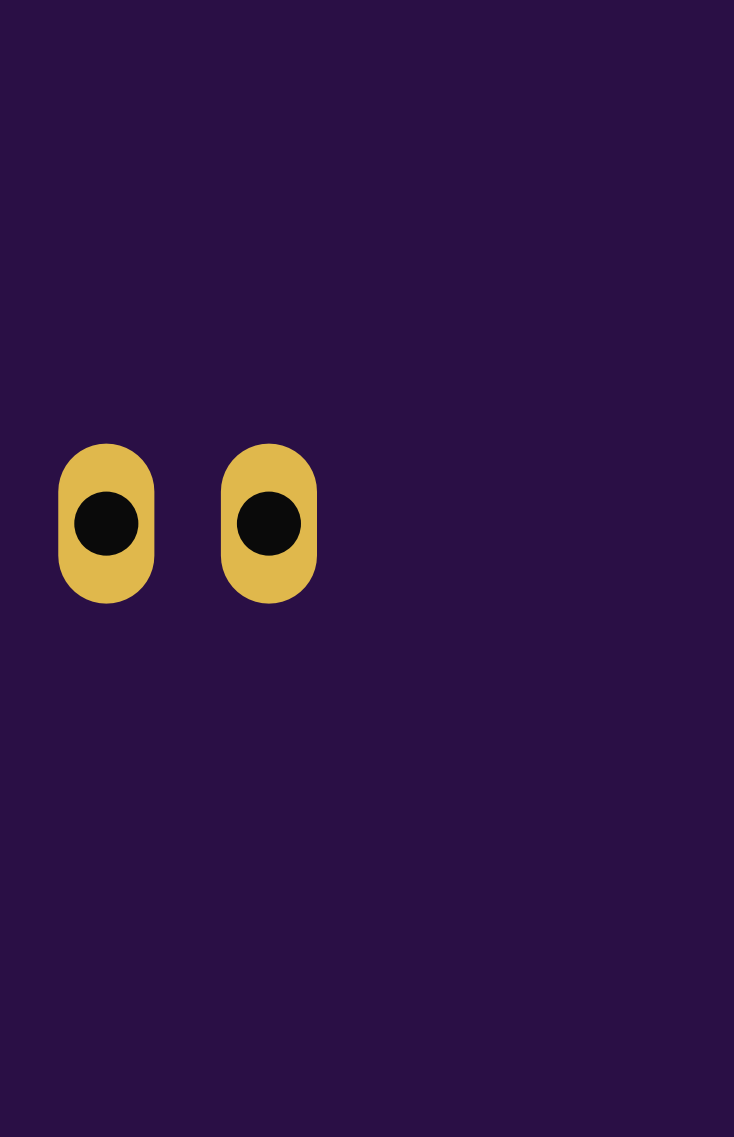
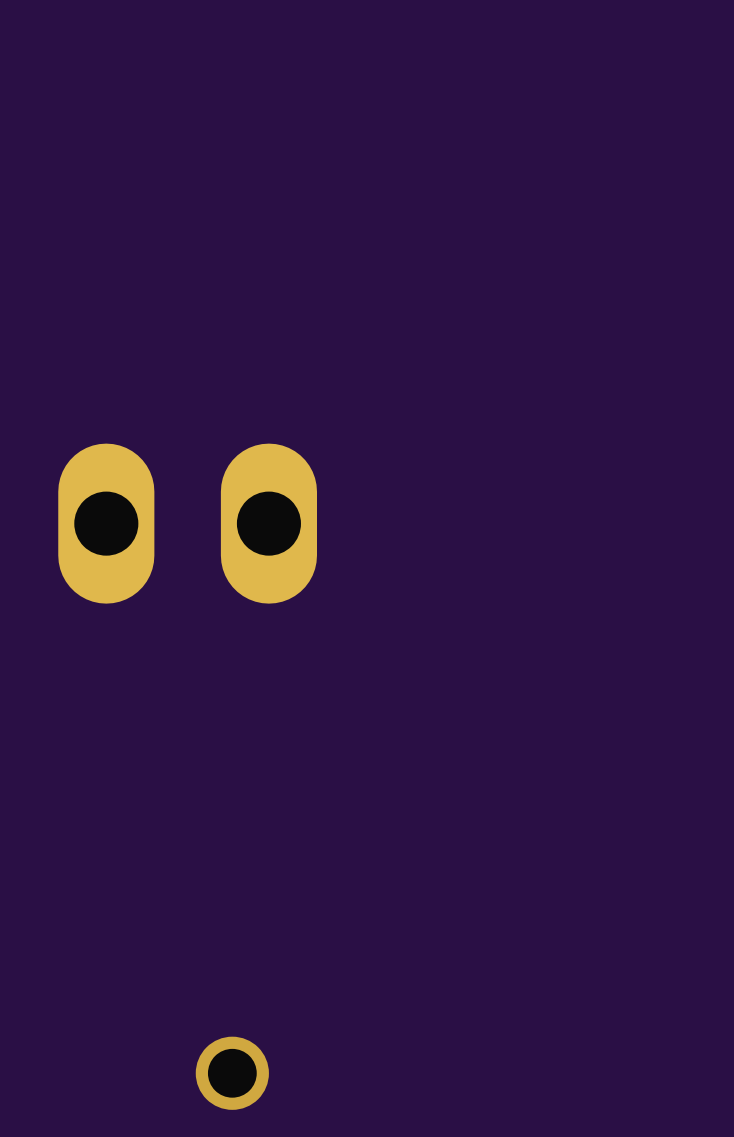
via: none -> (232, 1073)

